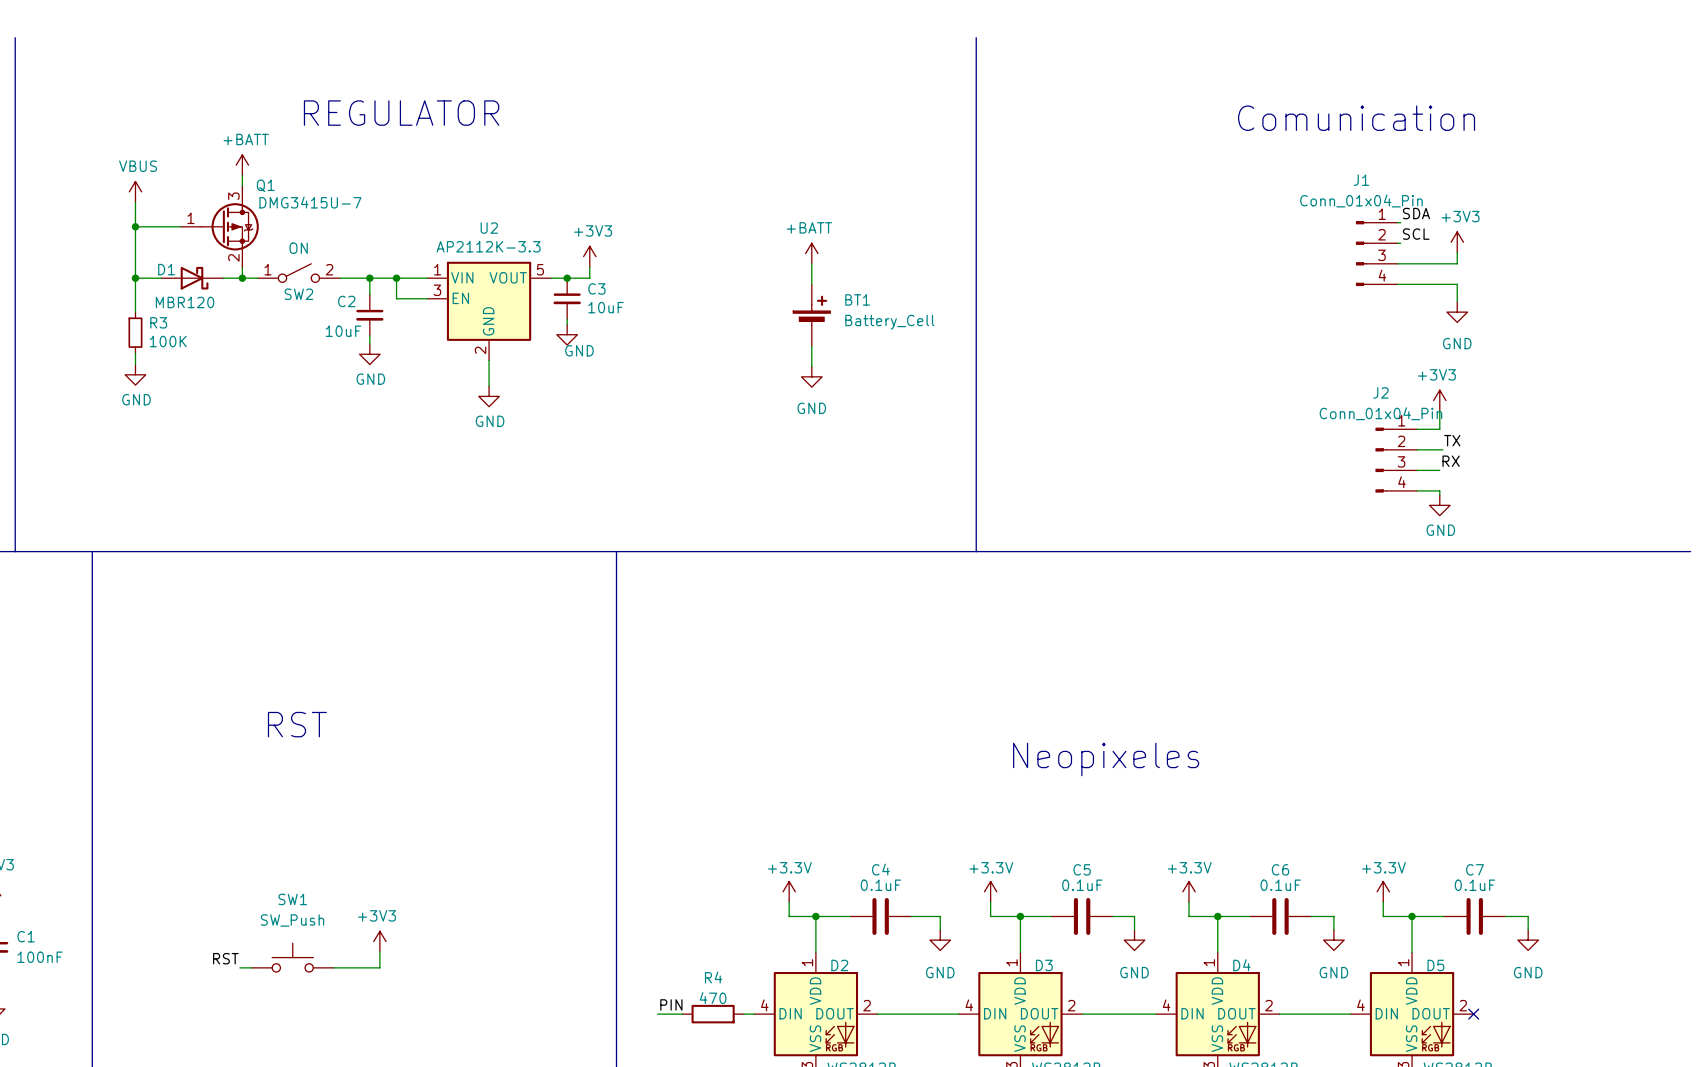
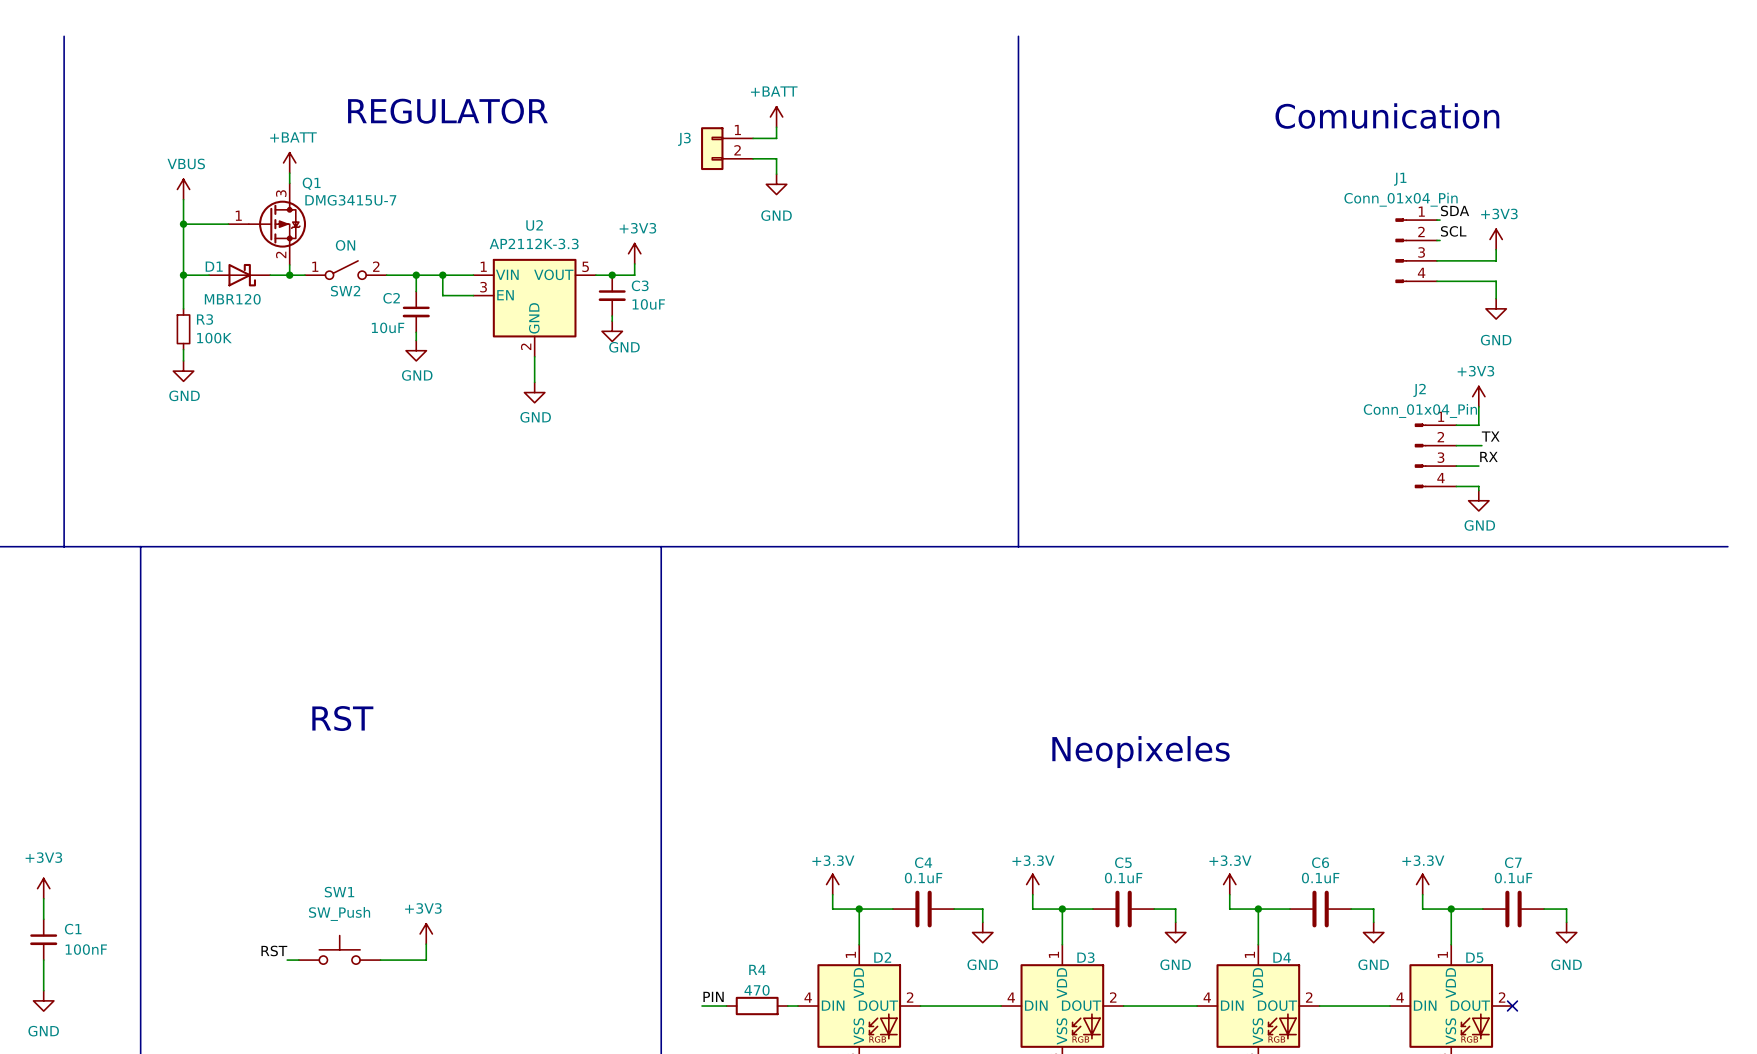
wire: none -> (776, 127) (776, 138) (753, 138)
J3: none -> (727, 148)
wire: none -> (753, 158) (776, 158) (776, 174)
power symbol: none -> GND (776, 184)
power symbol position: +BATT (811, 253) -> +BATT (776, 116)
wire: (811, 263) (811, 284) -> none
BT1: Battery_Cell (811, 315) -> none
wire: (811, 346) (811, 366) -> none
power symbol: GND (811, 376) -> none

